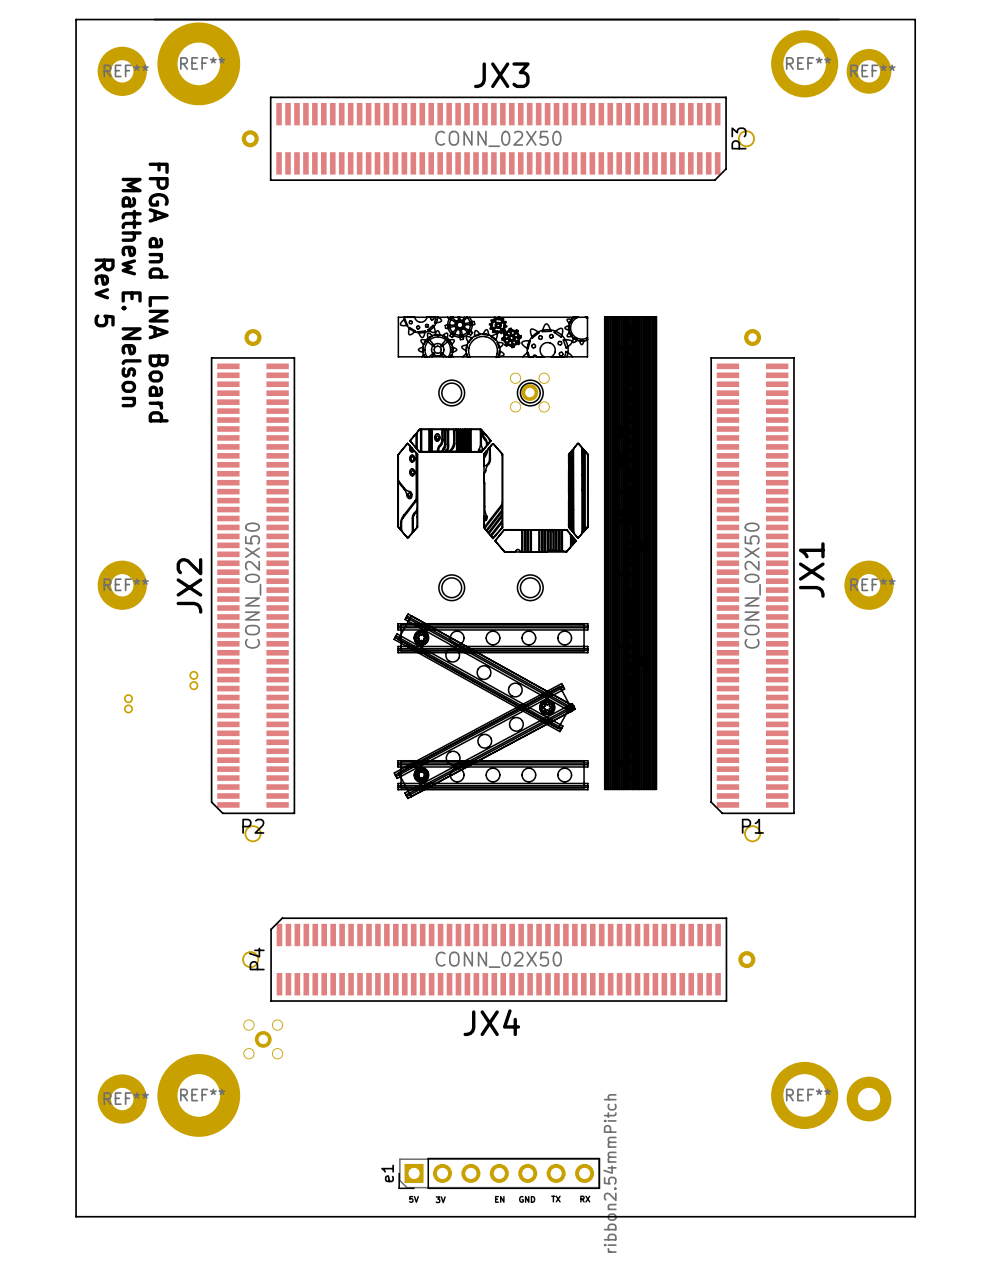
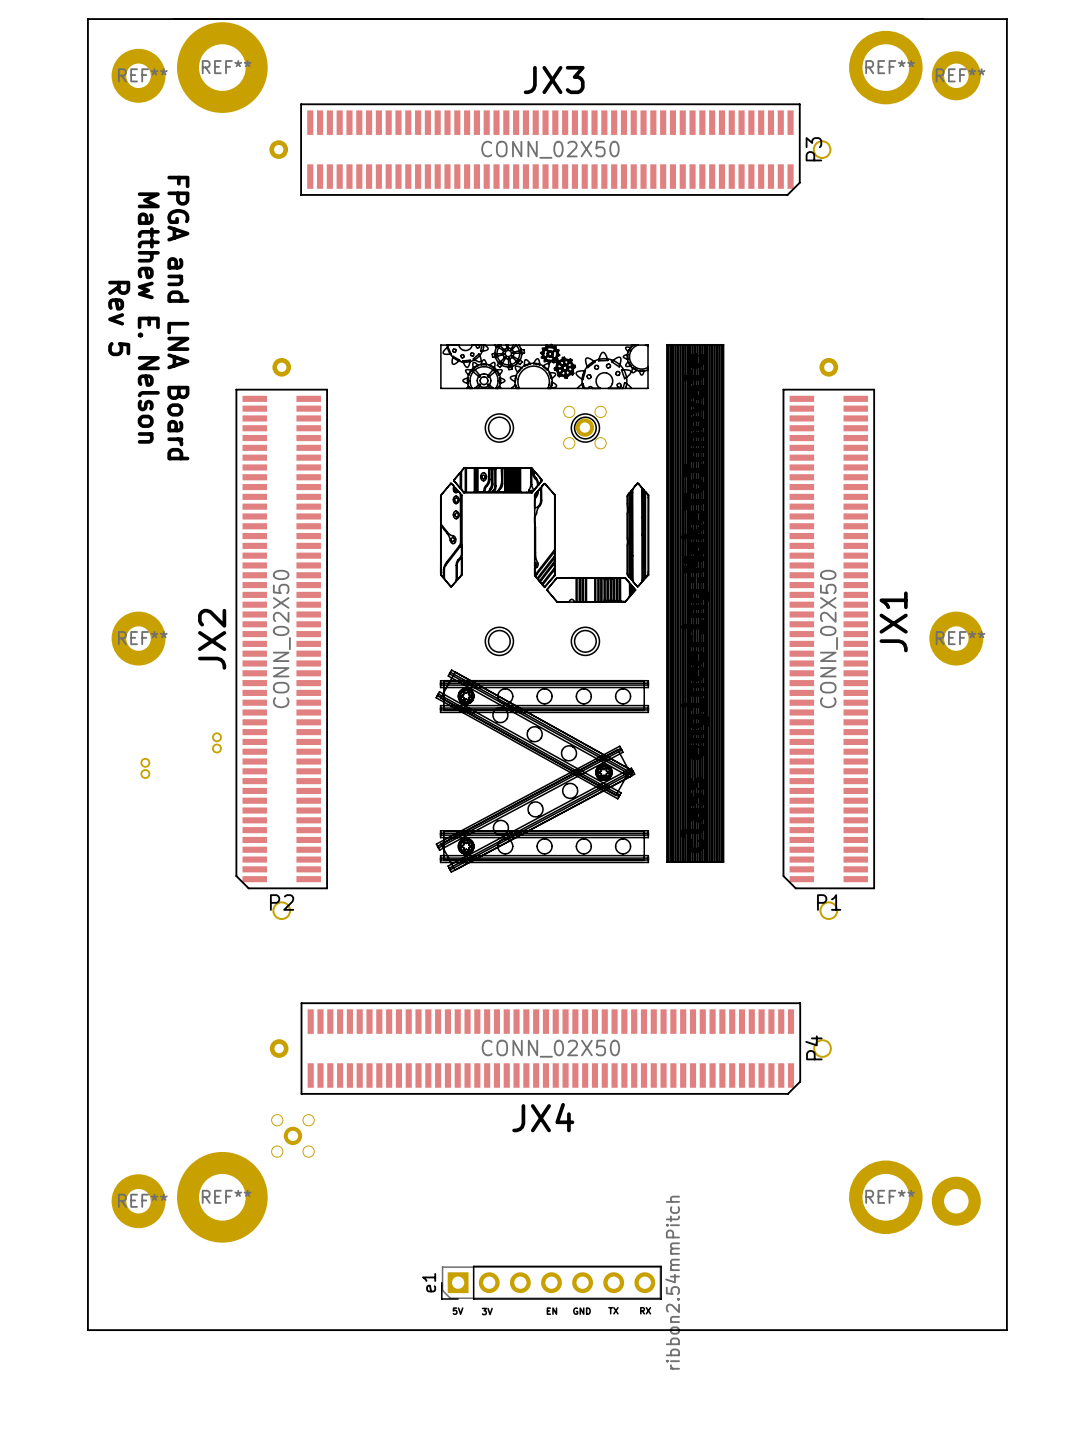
P4 rotation: 0° (498, 959) -> 180° (550, 1048)

